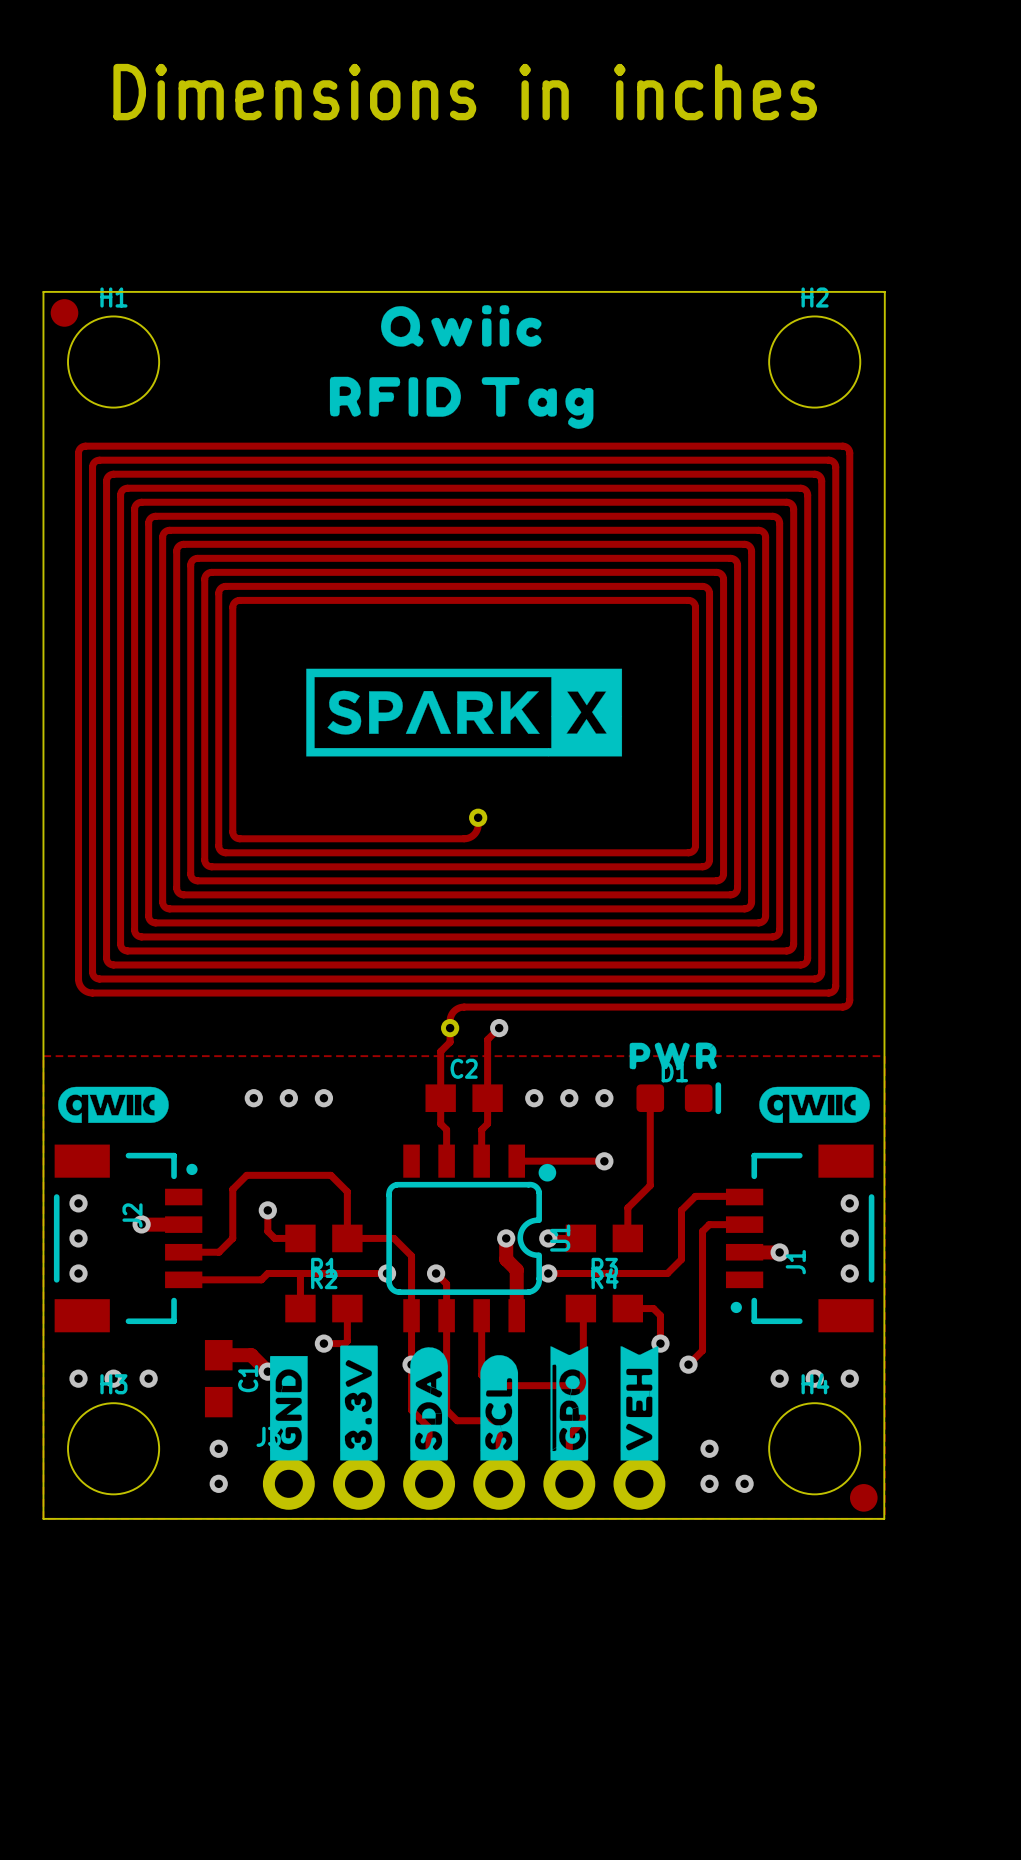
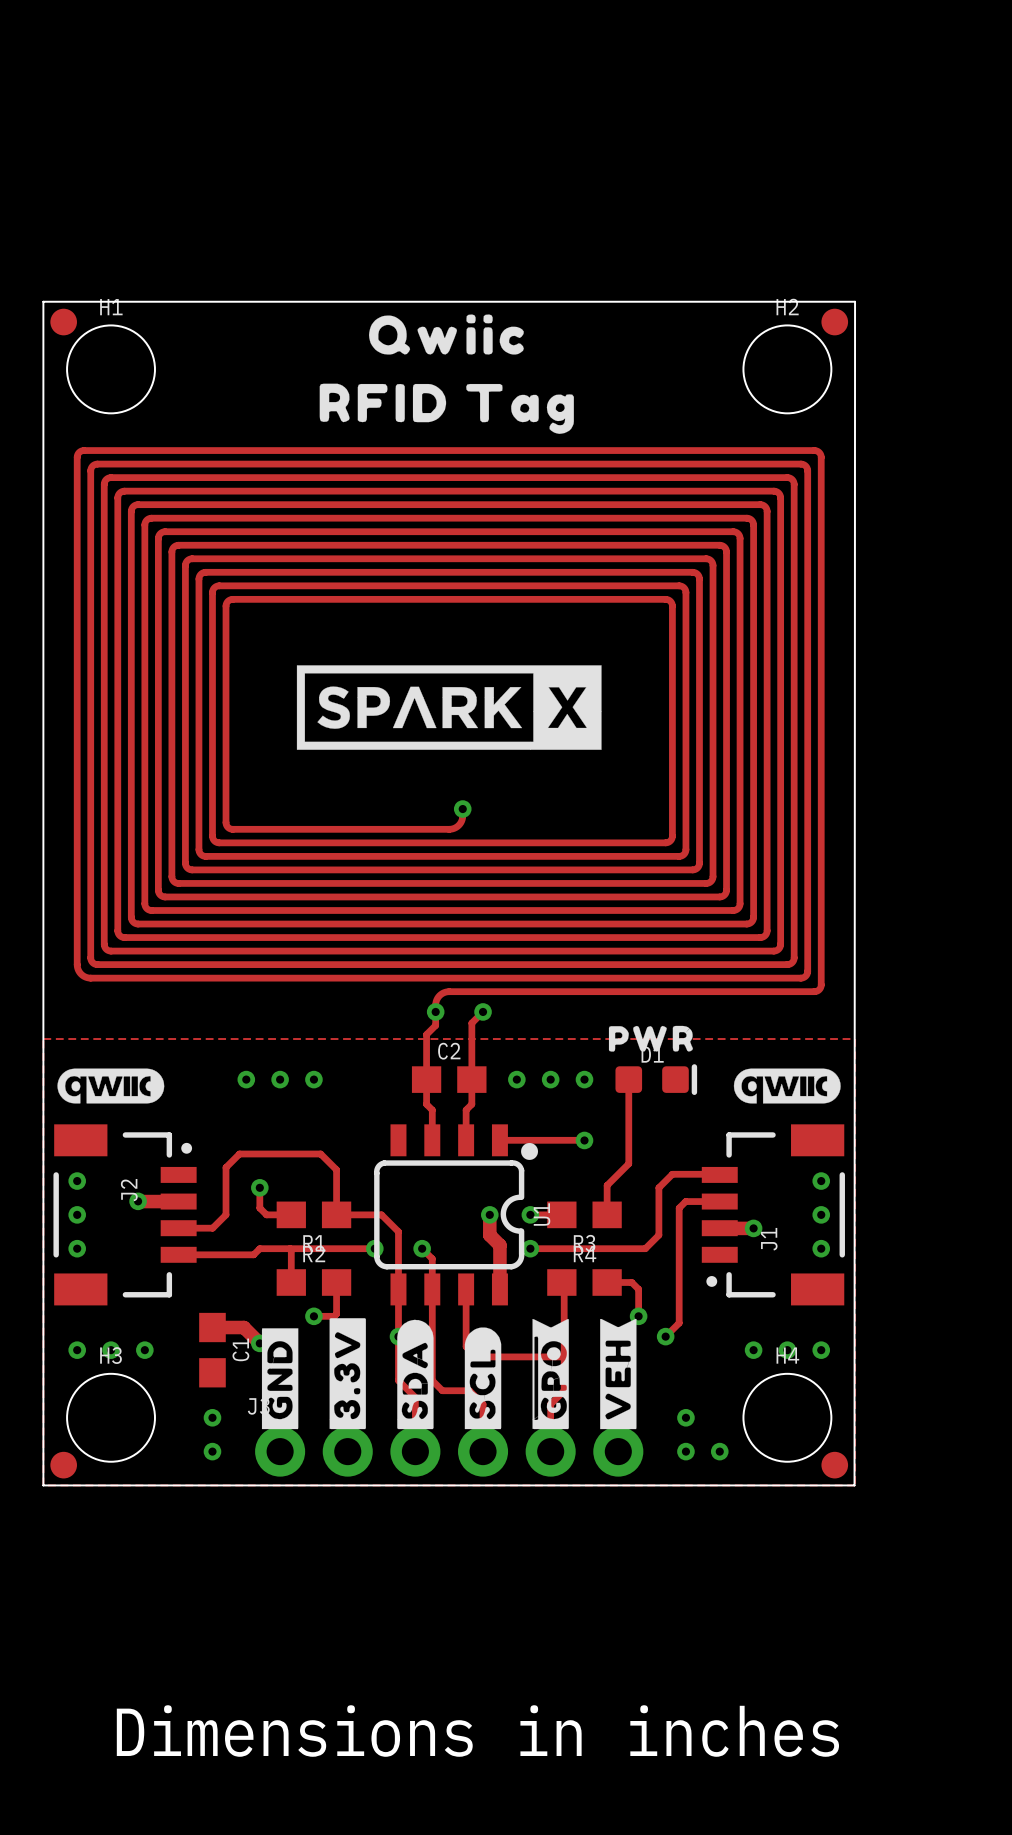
text: Dimensions in inches (465, 92) -> none
part: none -> (834, 322)
part: none -> (63, 1465)
text: none -> Dimensions in inches (477, 1731)

